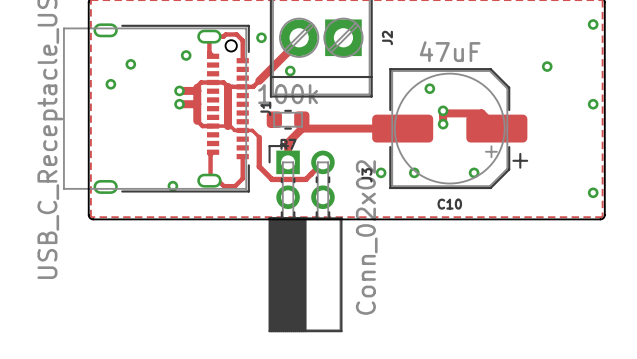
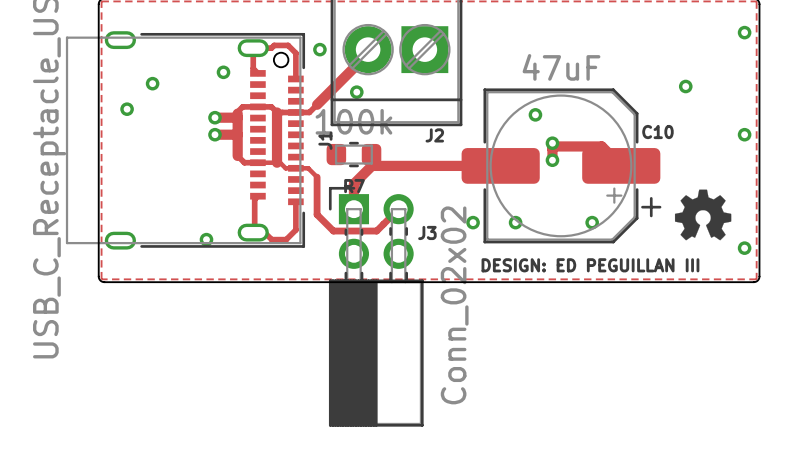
J2 name rotation: 0° (387, 37) -> 90° clockwise (434, 135)
J2 name position: J2 (387, 37) -> J2 (434, 135)
drawing: none -> [674, 189, 732, 241]
J3 name rotation: 0° (366, 175) -> 90° clockwise (427, 232)
J3 name position: J3 (366, 175) -> J3 (427, 232)
C10 name position: C10 (449, 204) -> C10 (657, 132)
text: none -> DESIGN: ED PEGUILLAN III (590, 265)

